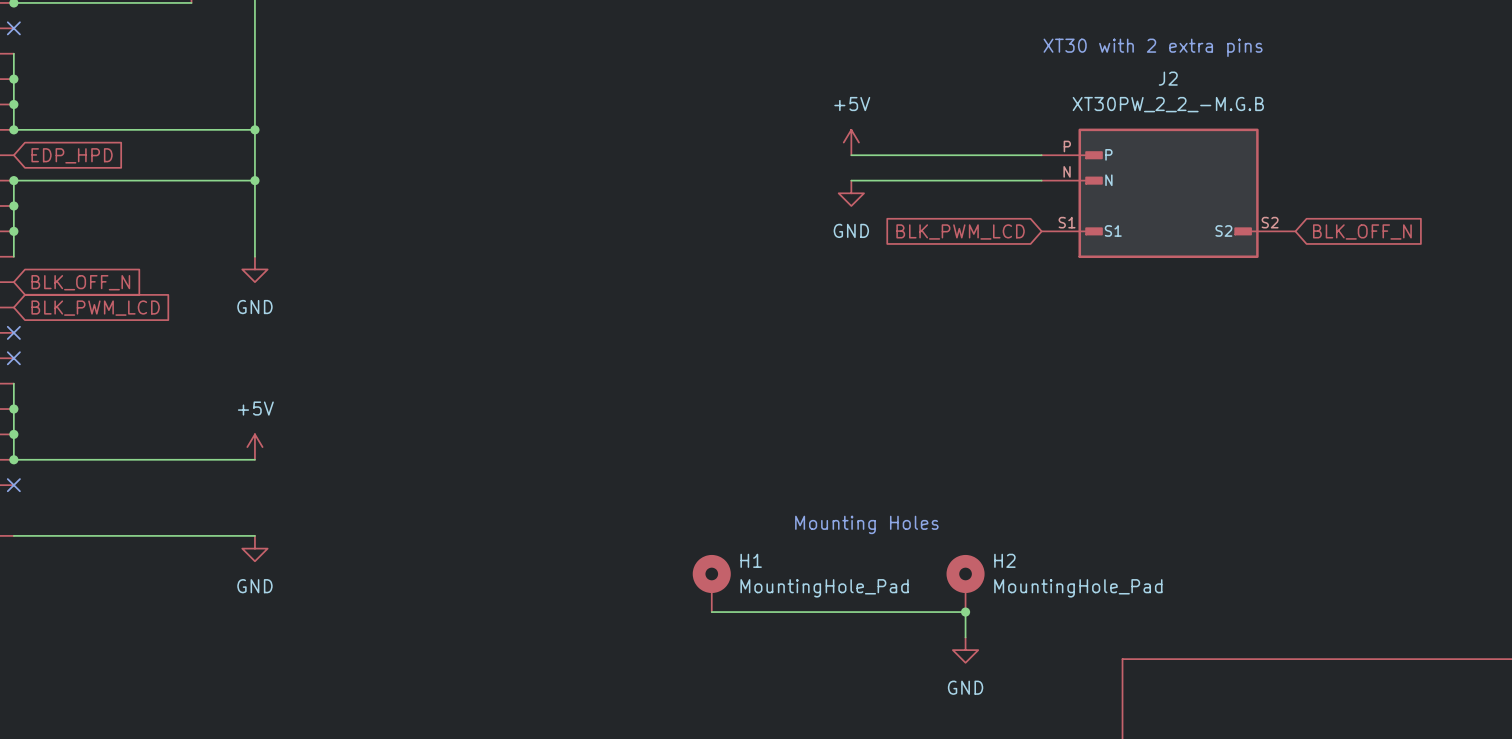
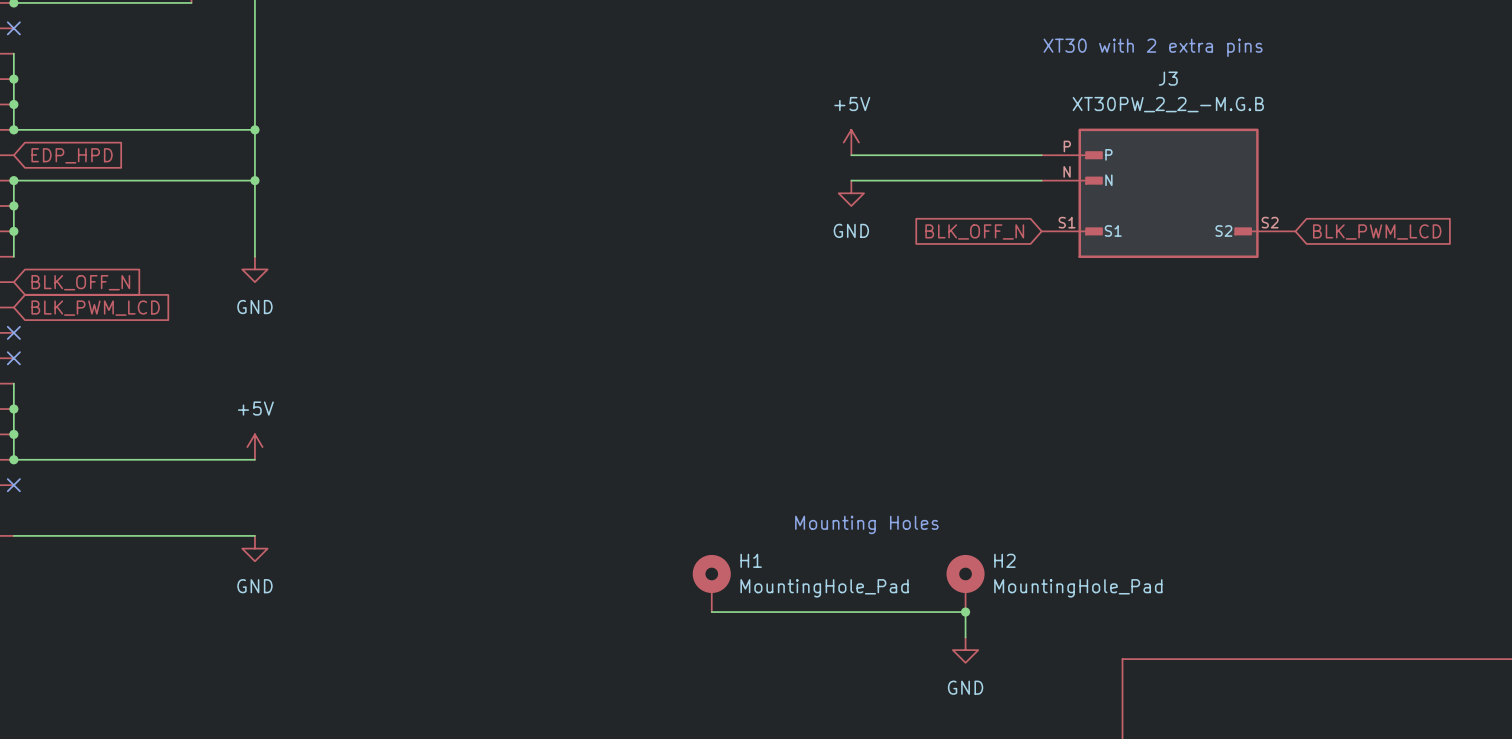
J2 name: J2 (1168, 78) -> J3 (1168, 78)
global label: BLK_PWM_LCD (960, 231) -> BLK_OFF_N (974, 231)
global label: BLK_OFF_N (1362, 231) -> BLK_PWM_LCD (1377, 231)

